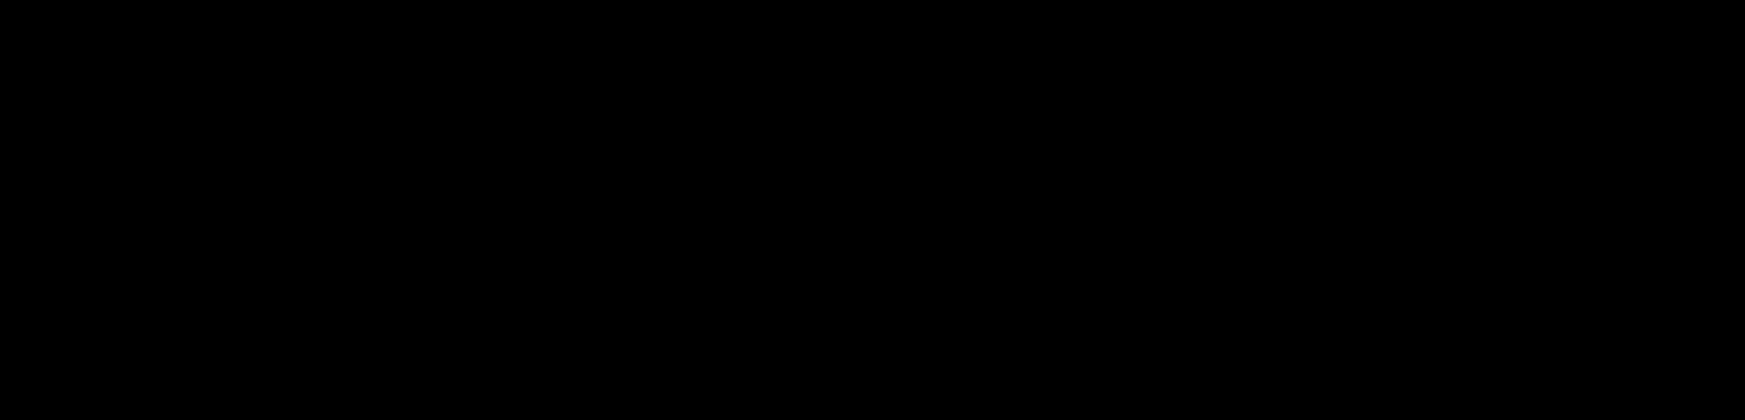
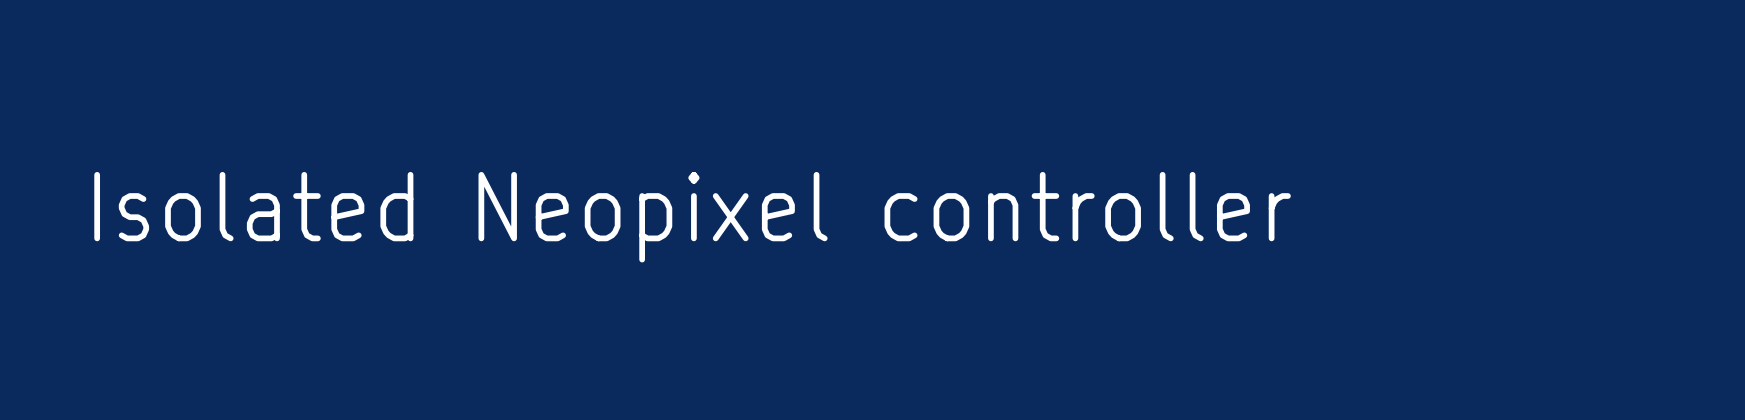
text: none -> Isolated Neopixel controller (692, 217)

